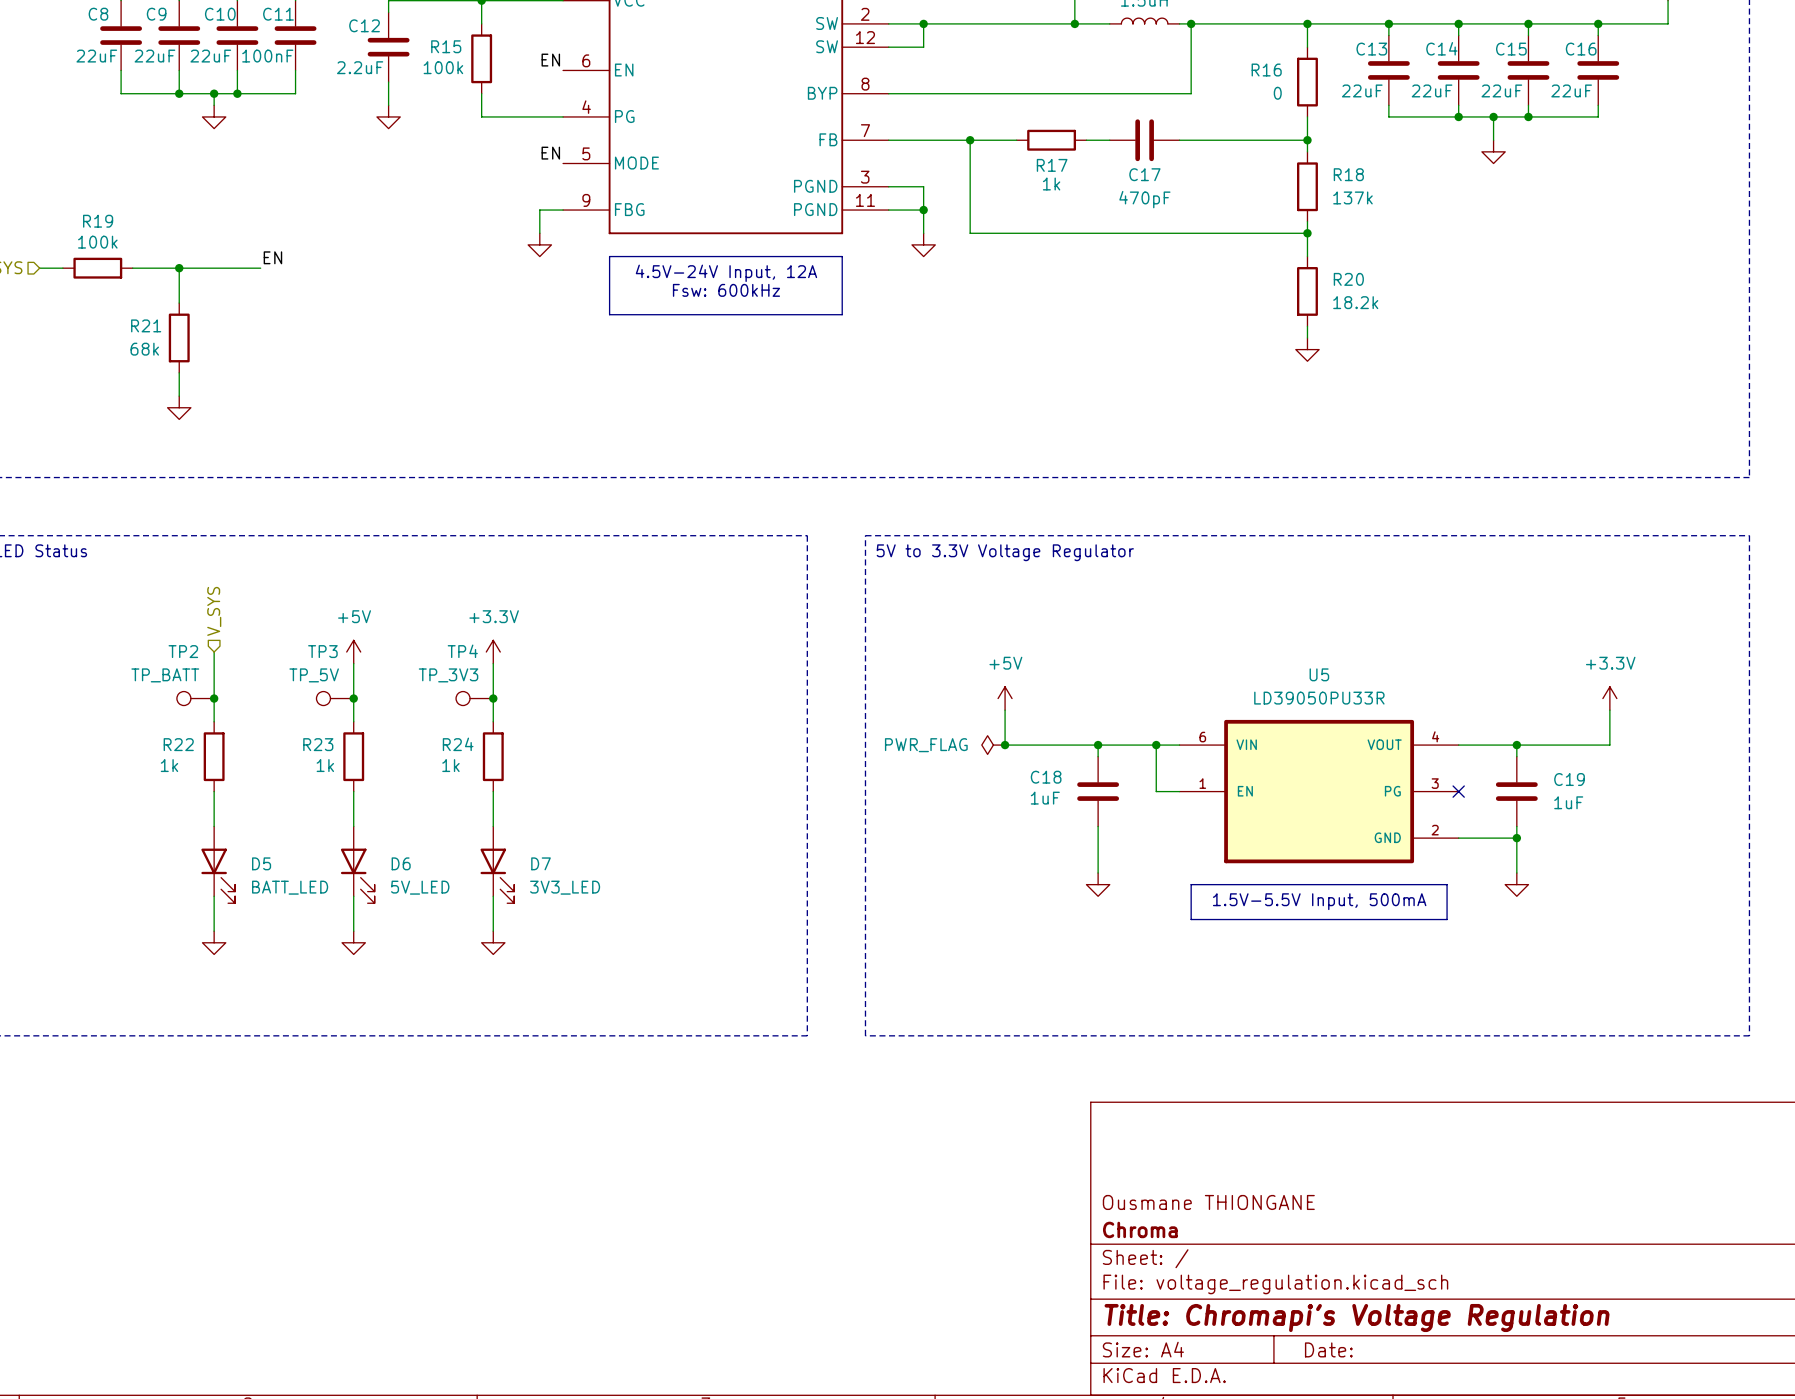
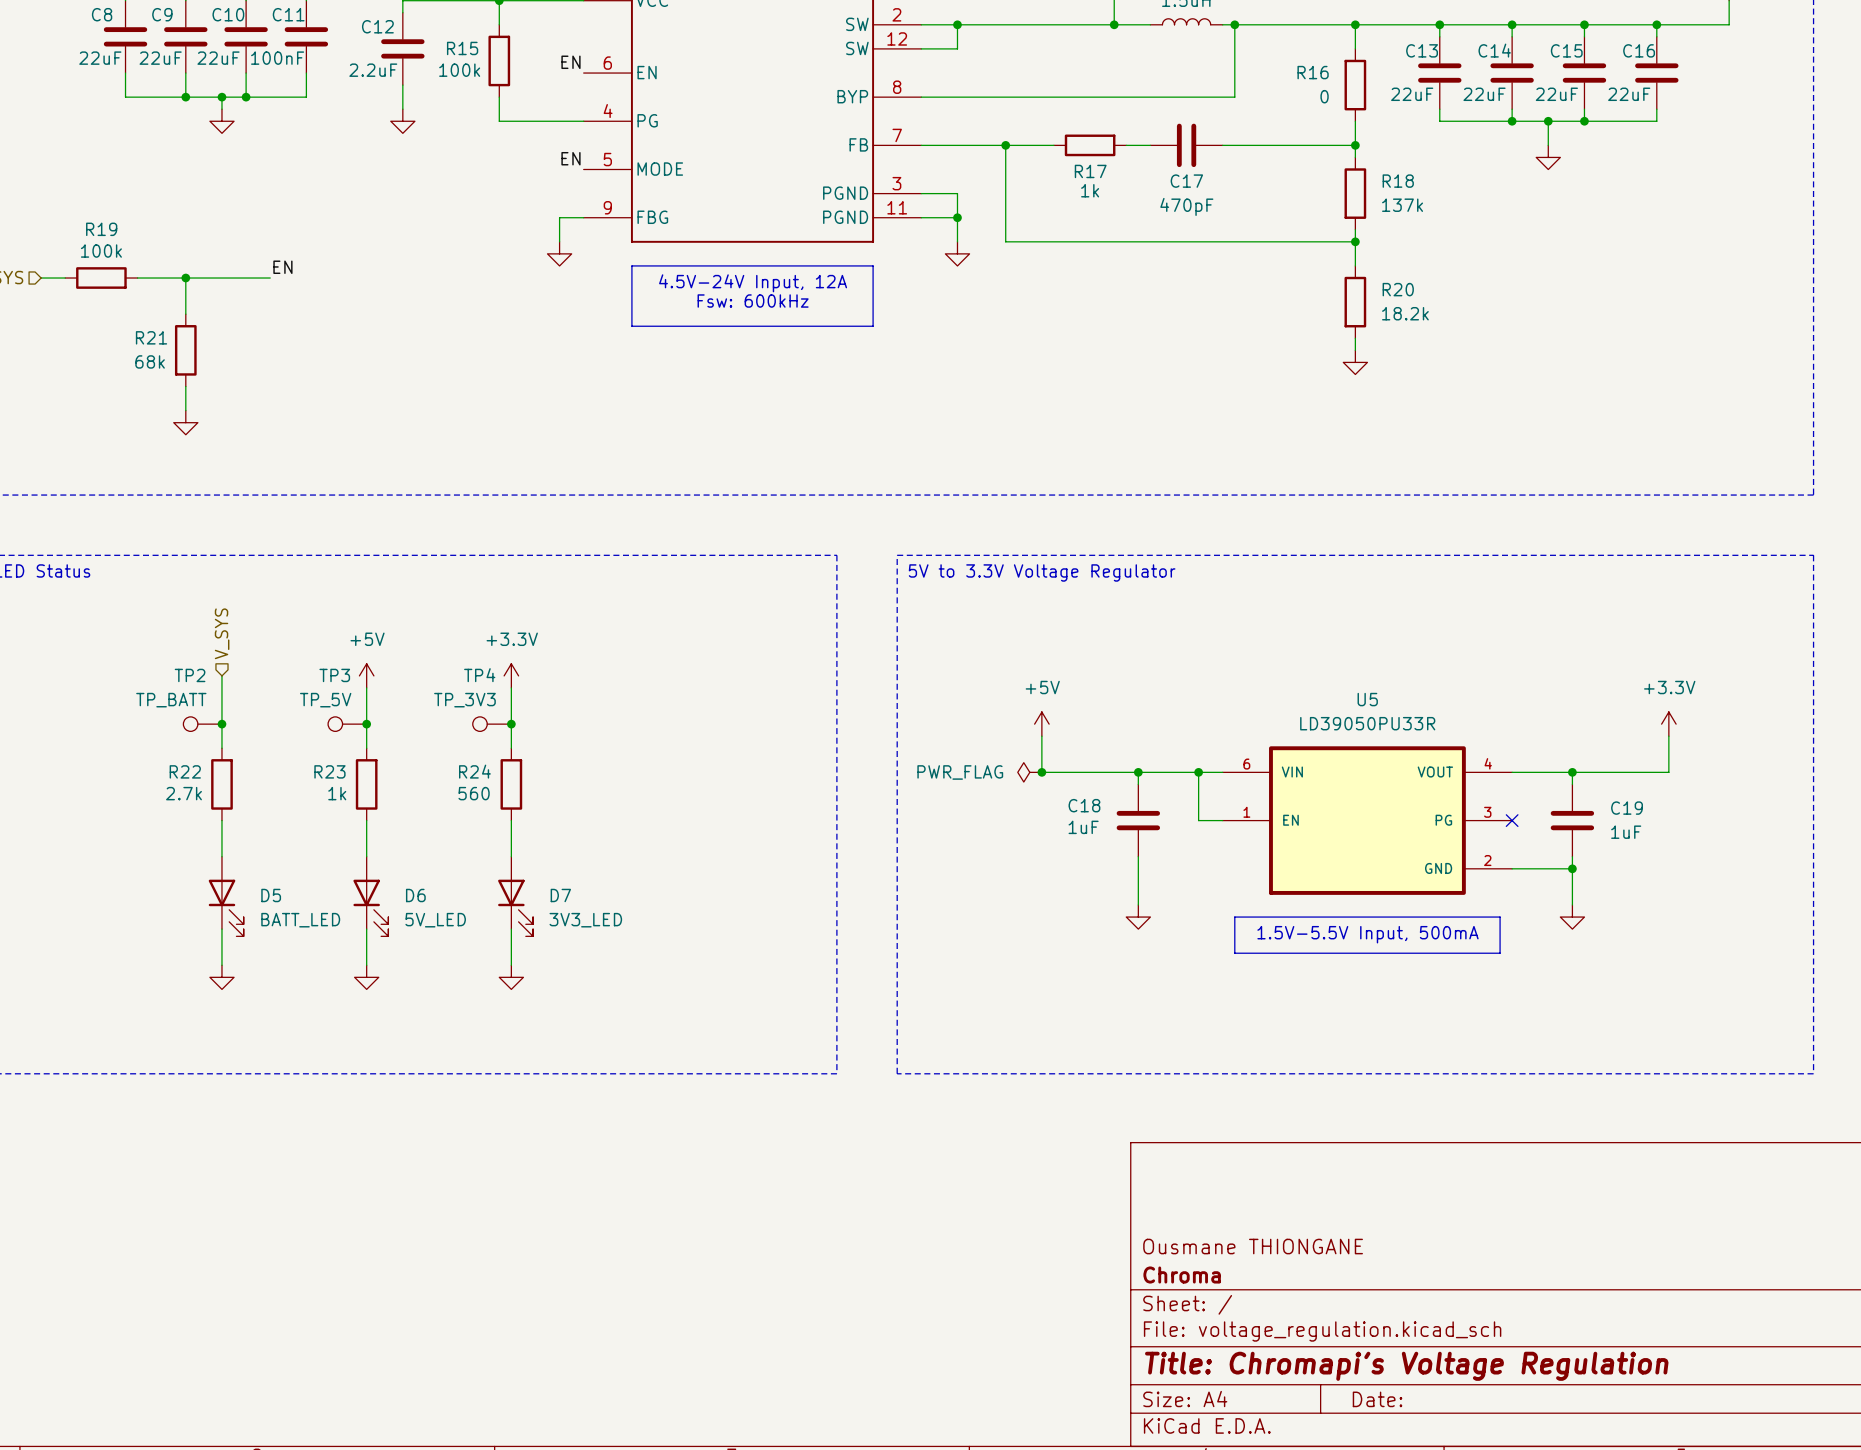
R22 value: 1k (169, 765) -> 2.7k (184, 793)
R24 value: 1k (450, 765) -> 560 (474, 793)

